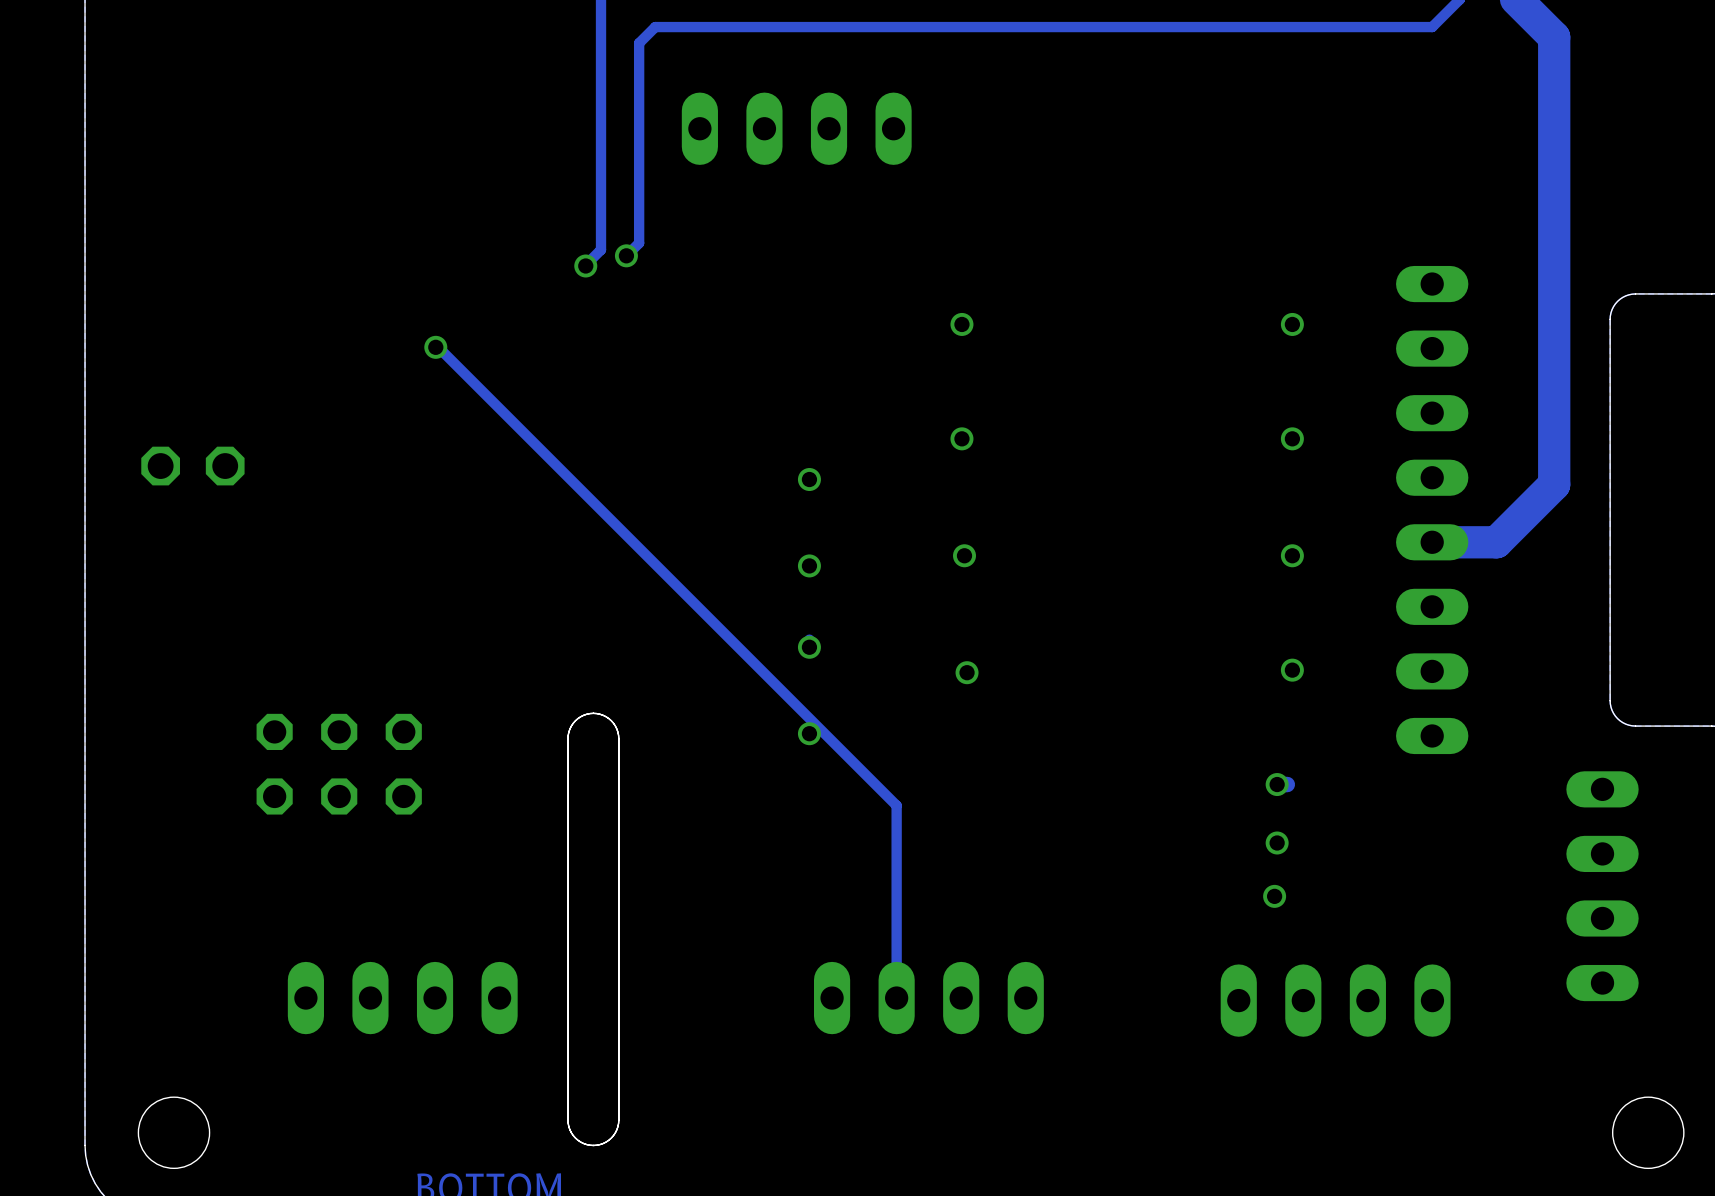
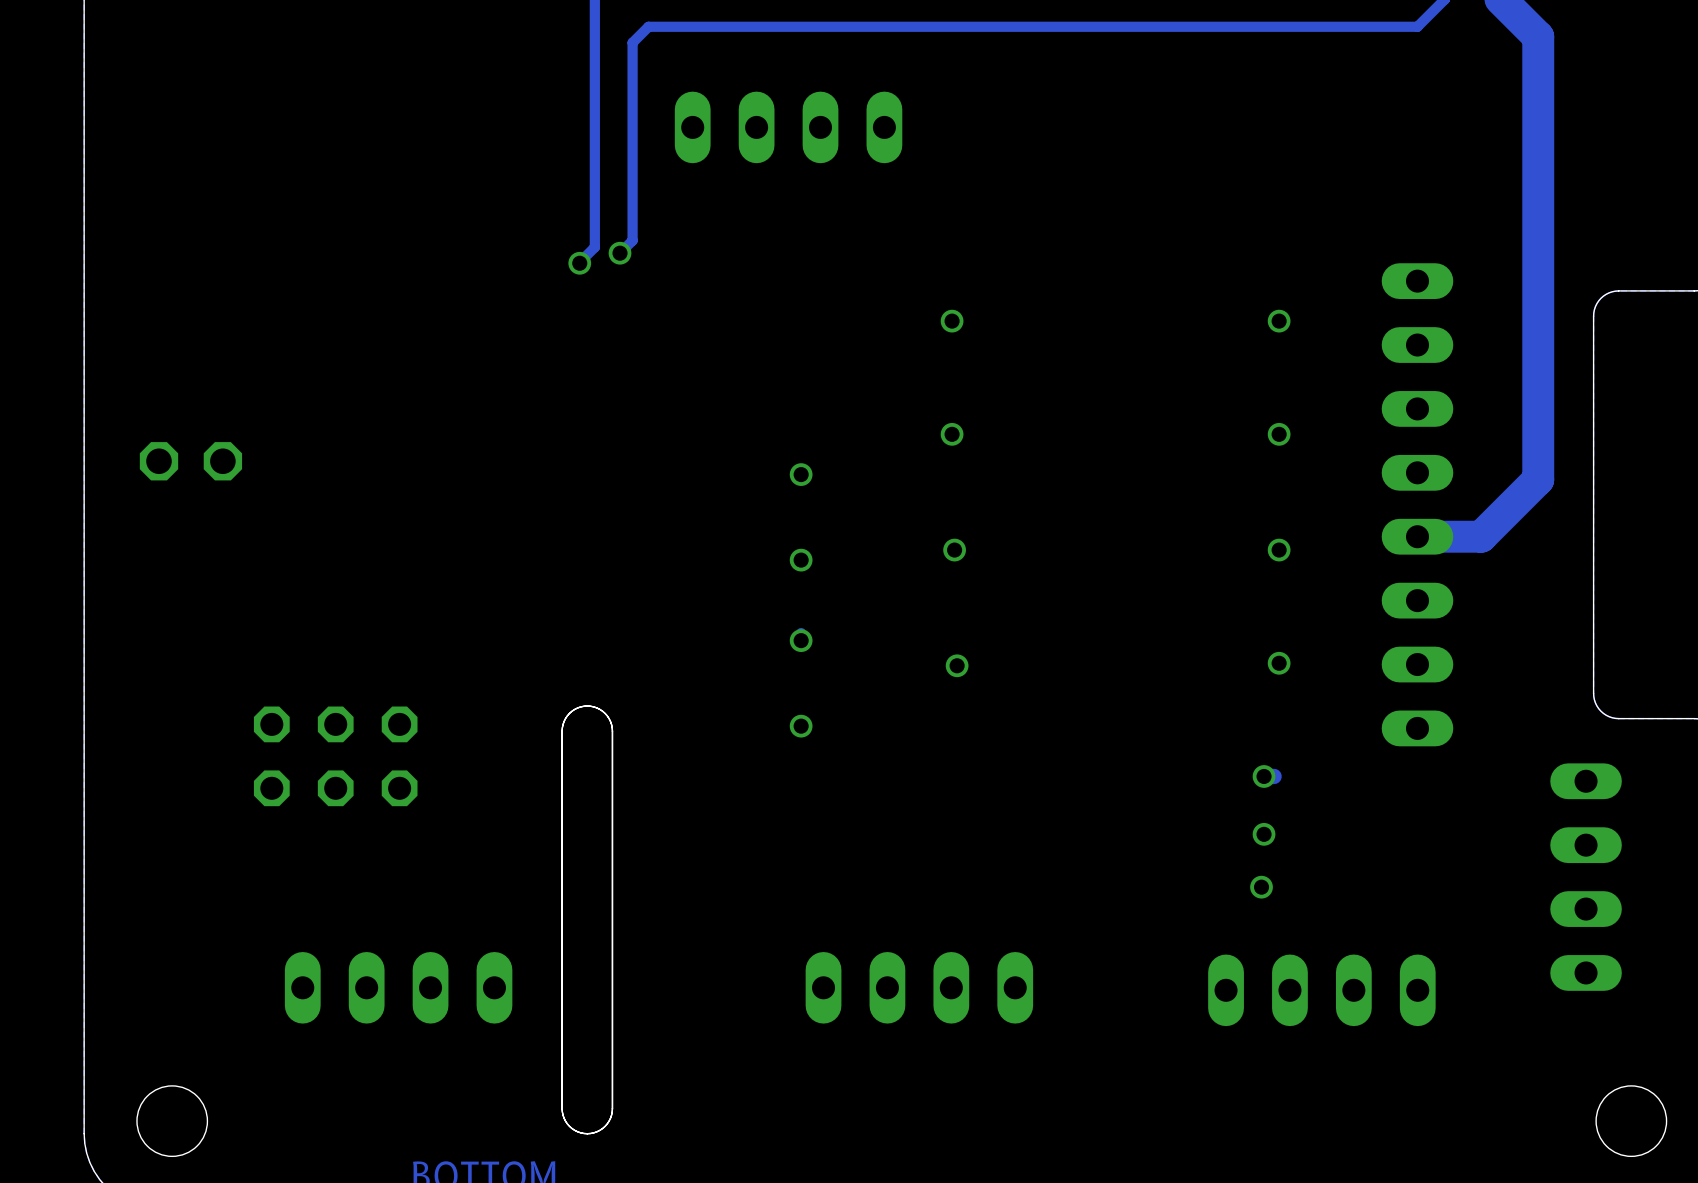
track: (435, 347) (438, 347) (896, 805) (896, 998) -> none
via: (435, 347) -> none

